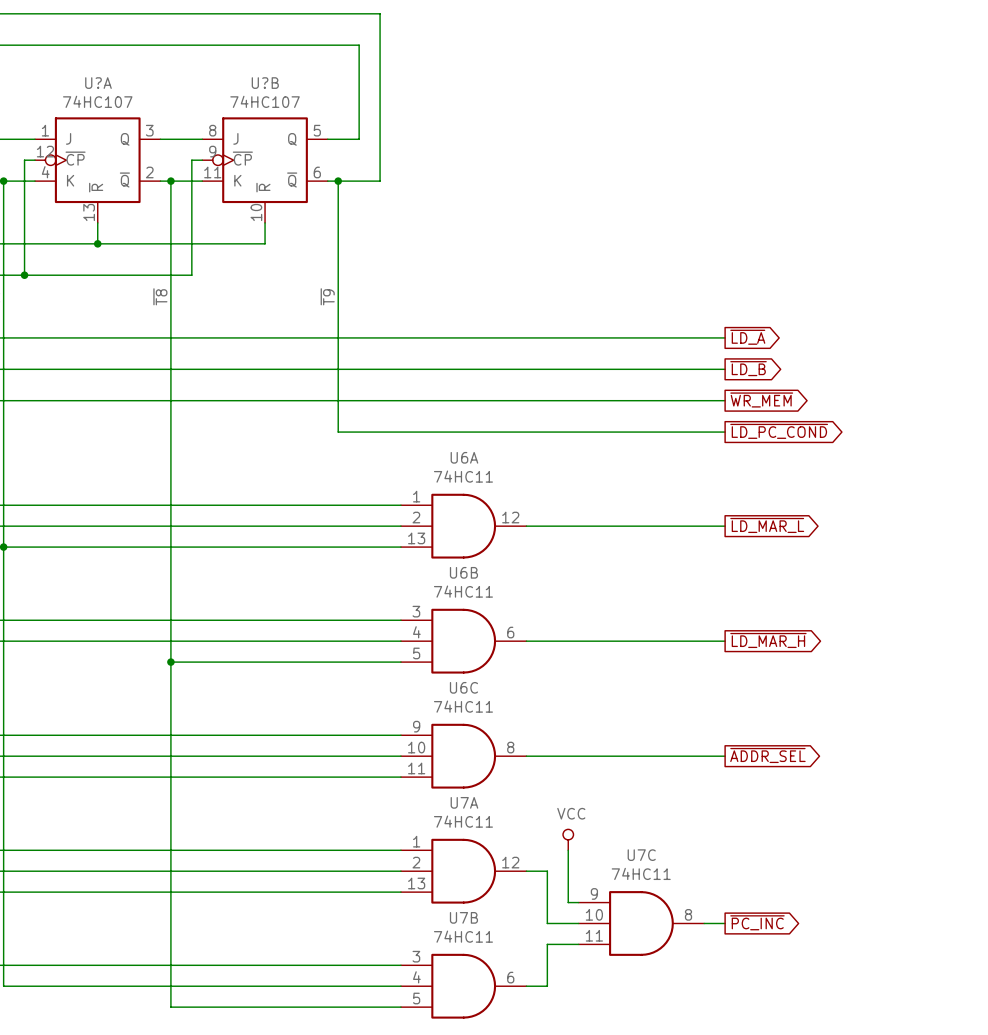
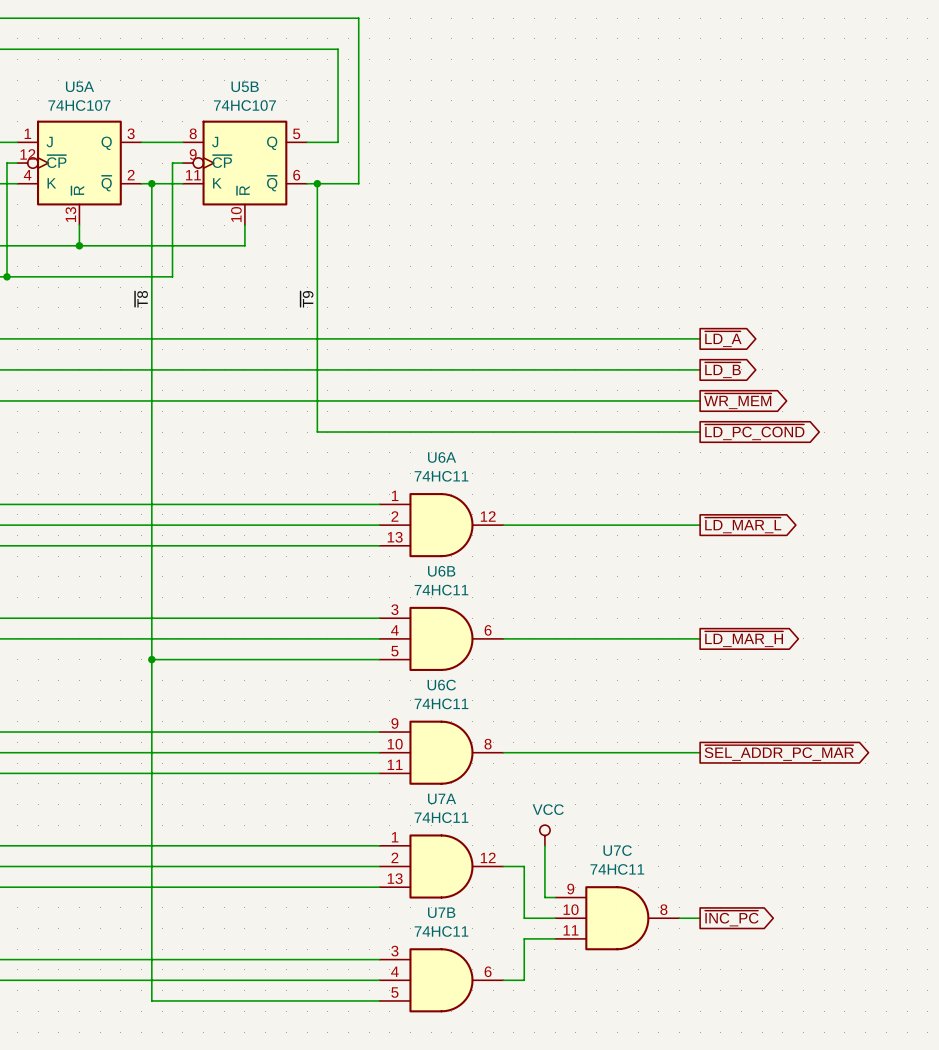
U?A name: U?A (98, 83) -> U5A (79, 86)
U?B name: U?B (265, 83) -> U5B (245, 86)
global label: ~{ADDR_SEL} (767, 755) -> ~{SEL_ADDR_PC_MAR} (779, 753)
global label: ~{PC_INC} (757, 922) -> ~{INC_PC} (731, 918)

